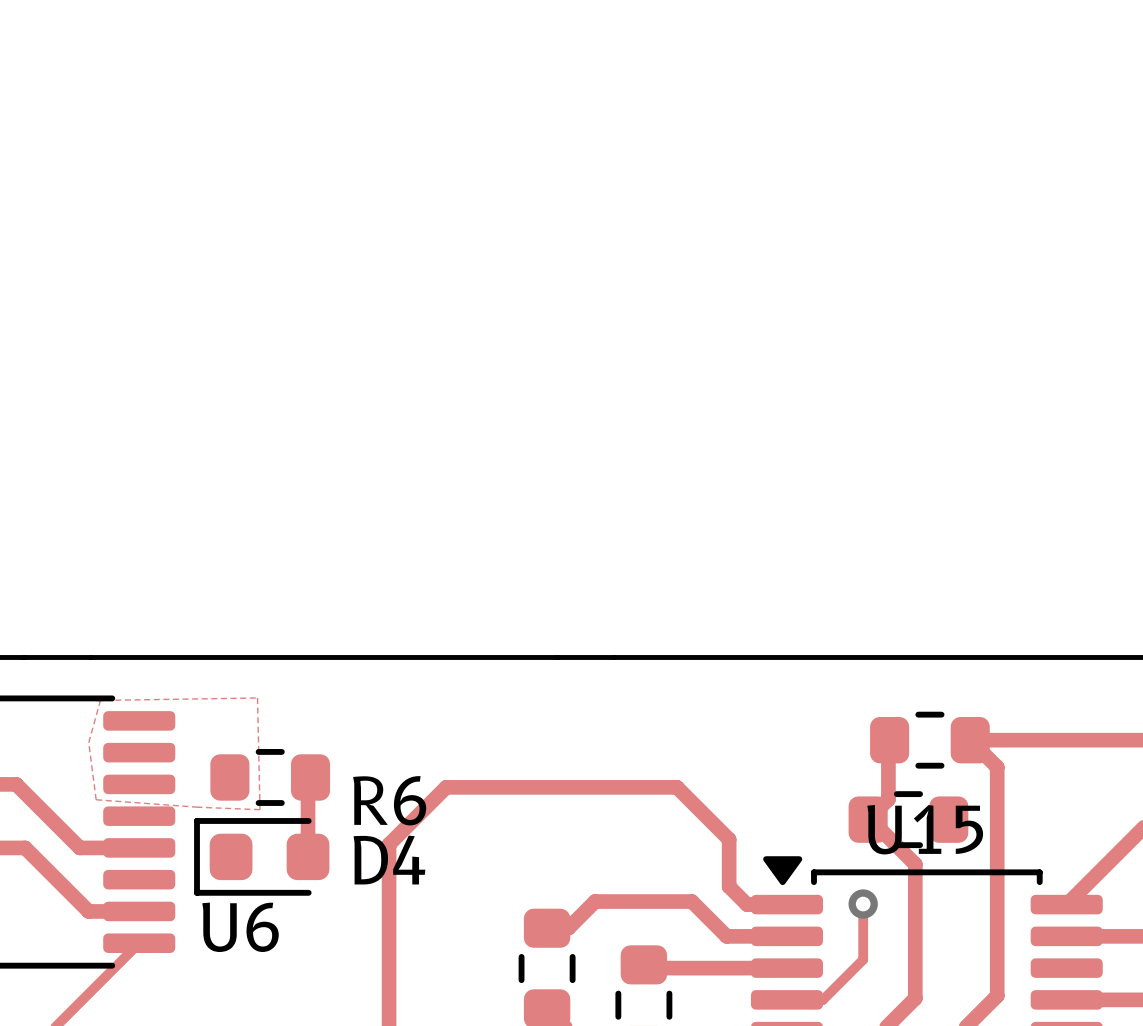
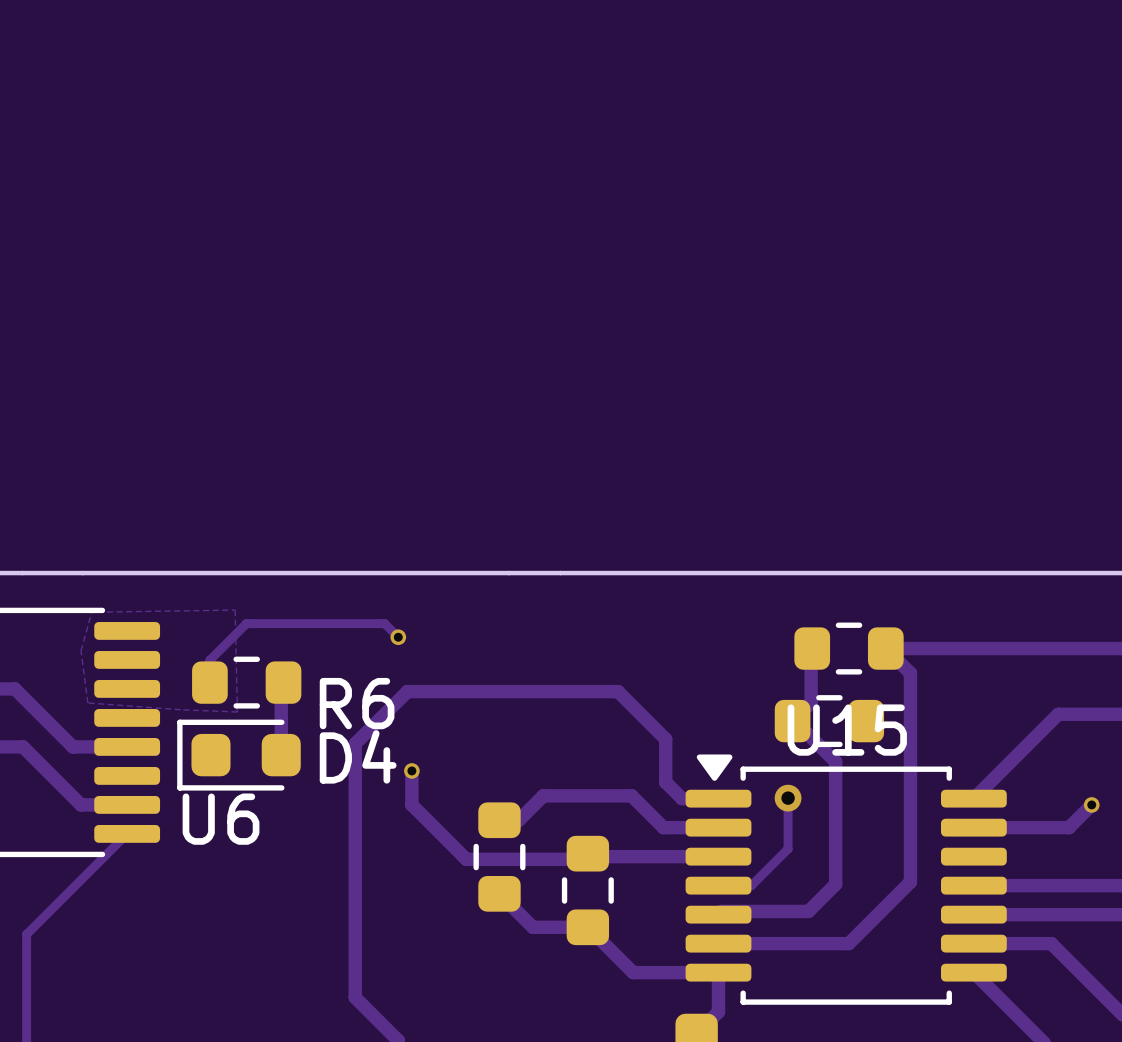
track: none -> (398, 637) (384, 623) (246, 623) (209, 660) (209, 682)
via: none -> (398, 637)
track: none -> (411, 770) (411, 804) (466, 859) (582, 859) (587, 853)
via: none -> (411, 770)

